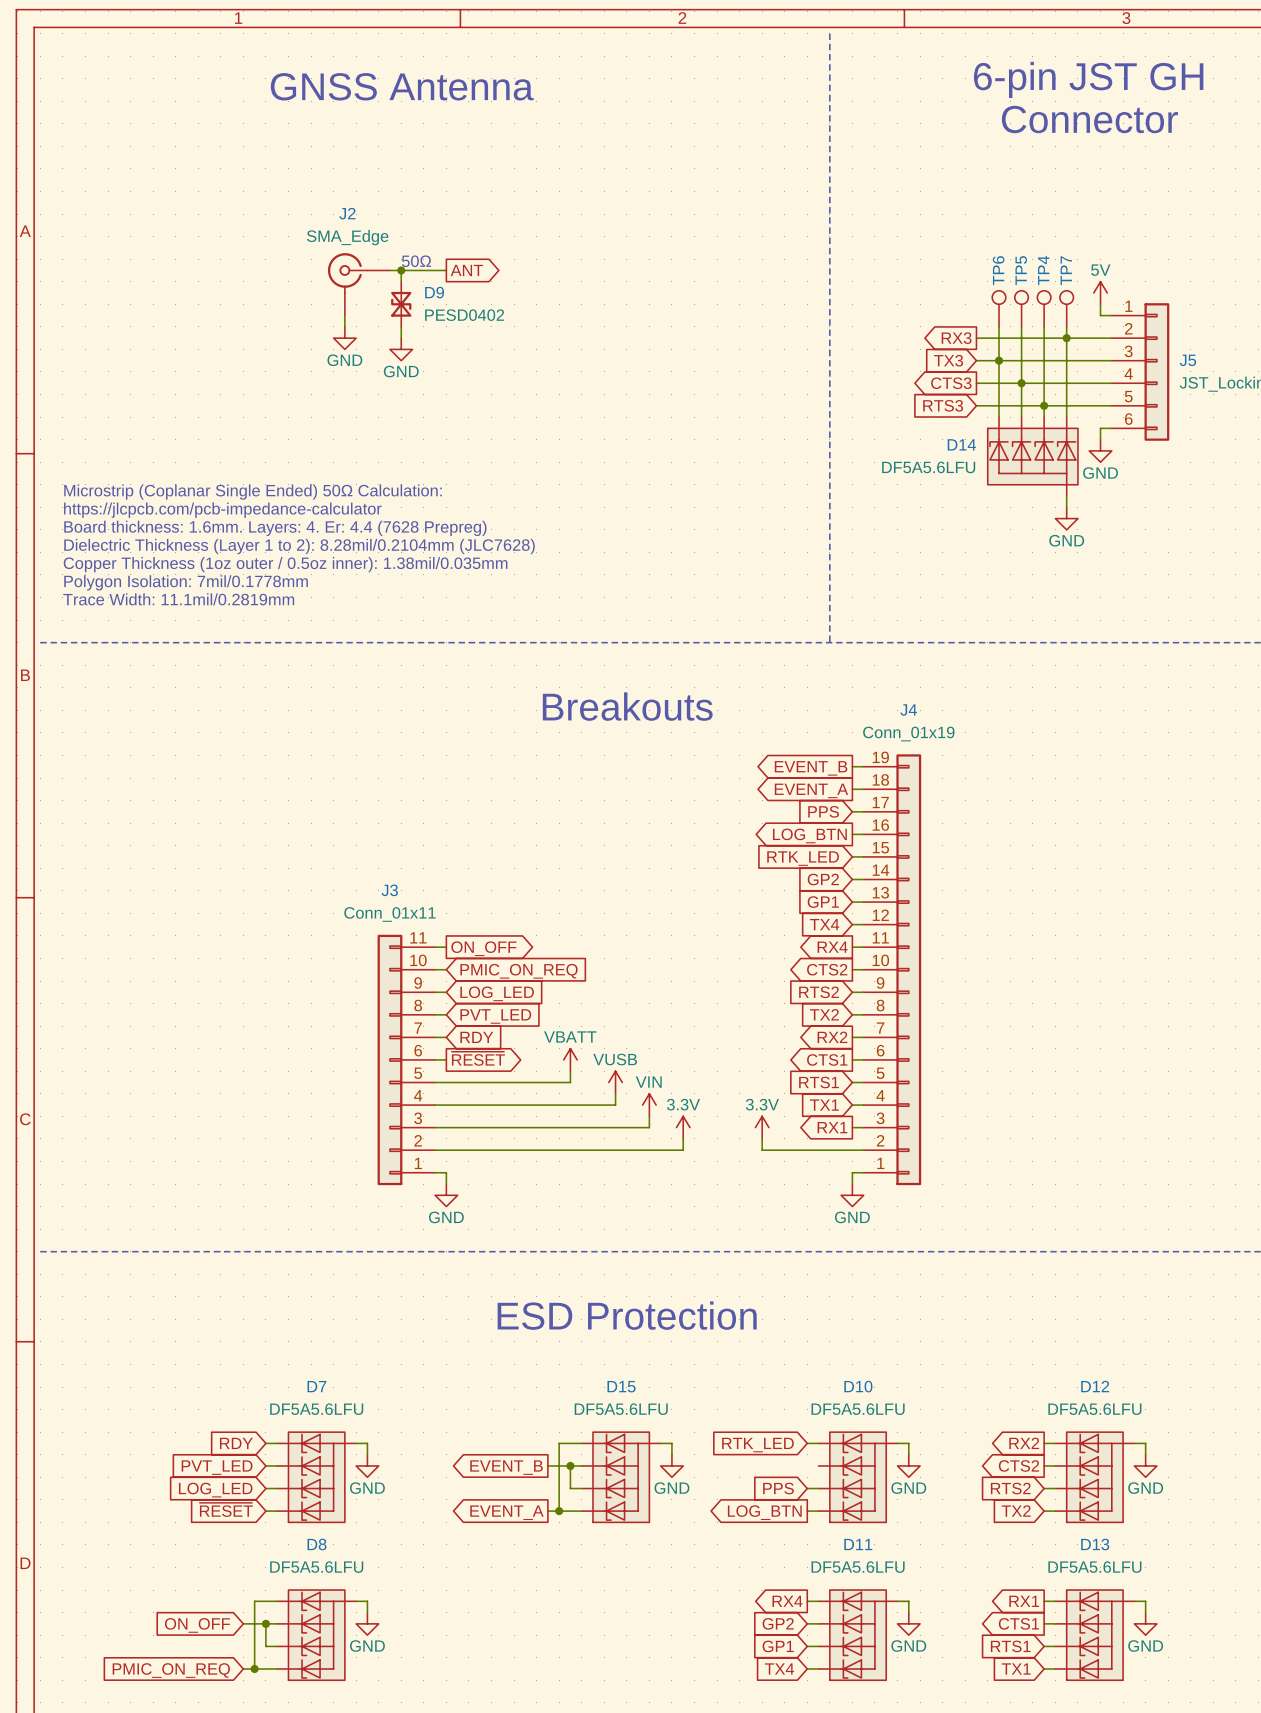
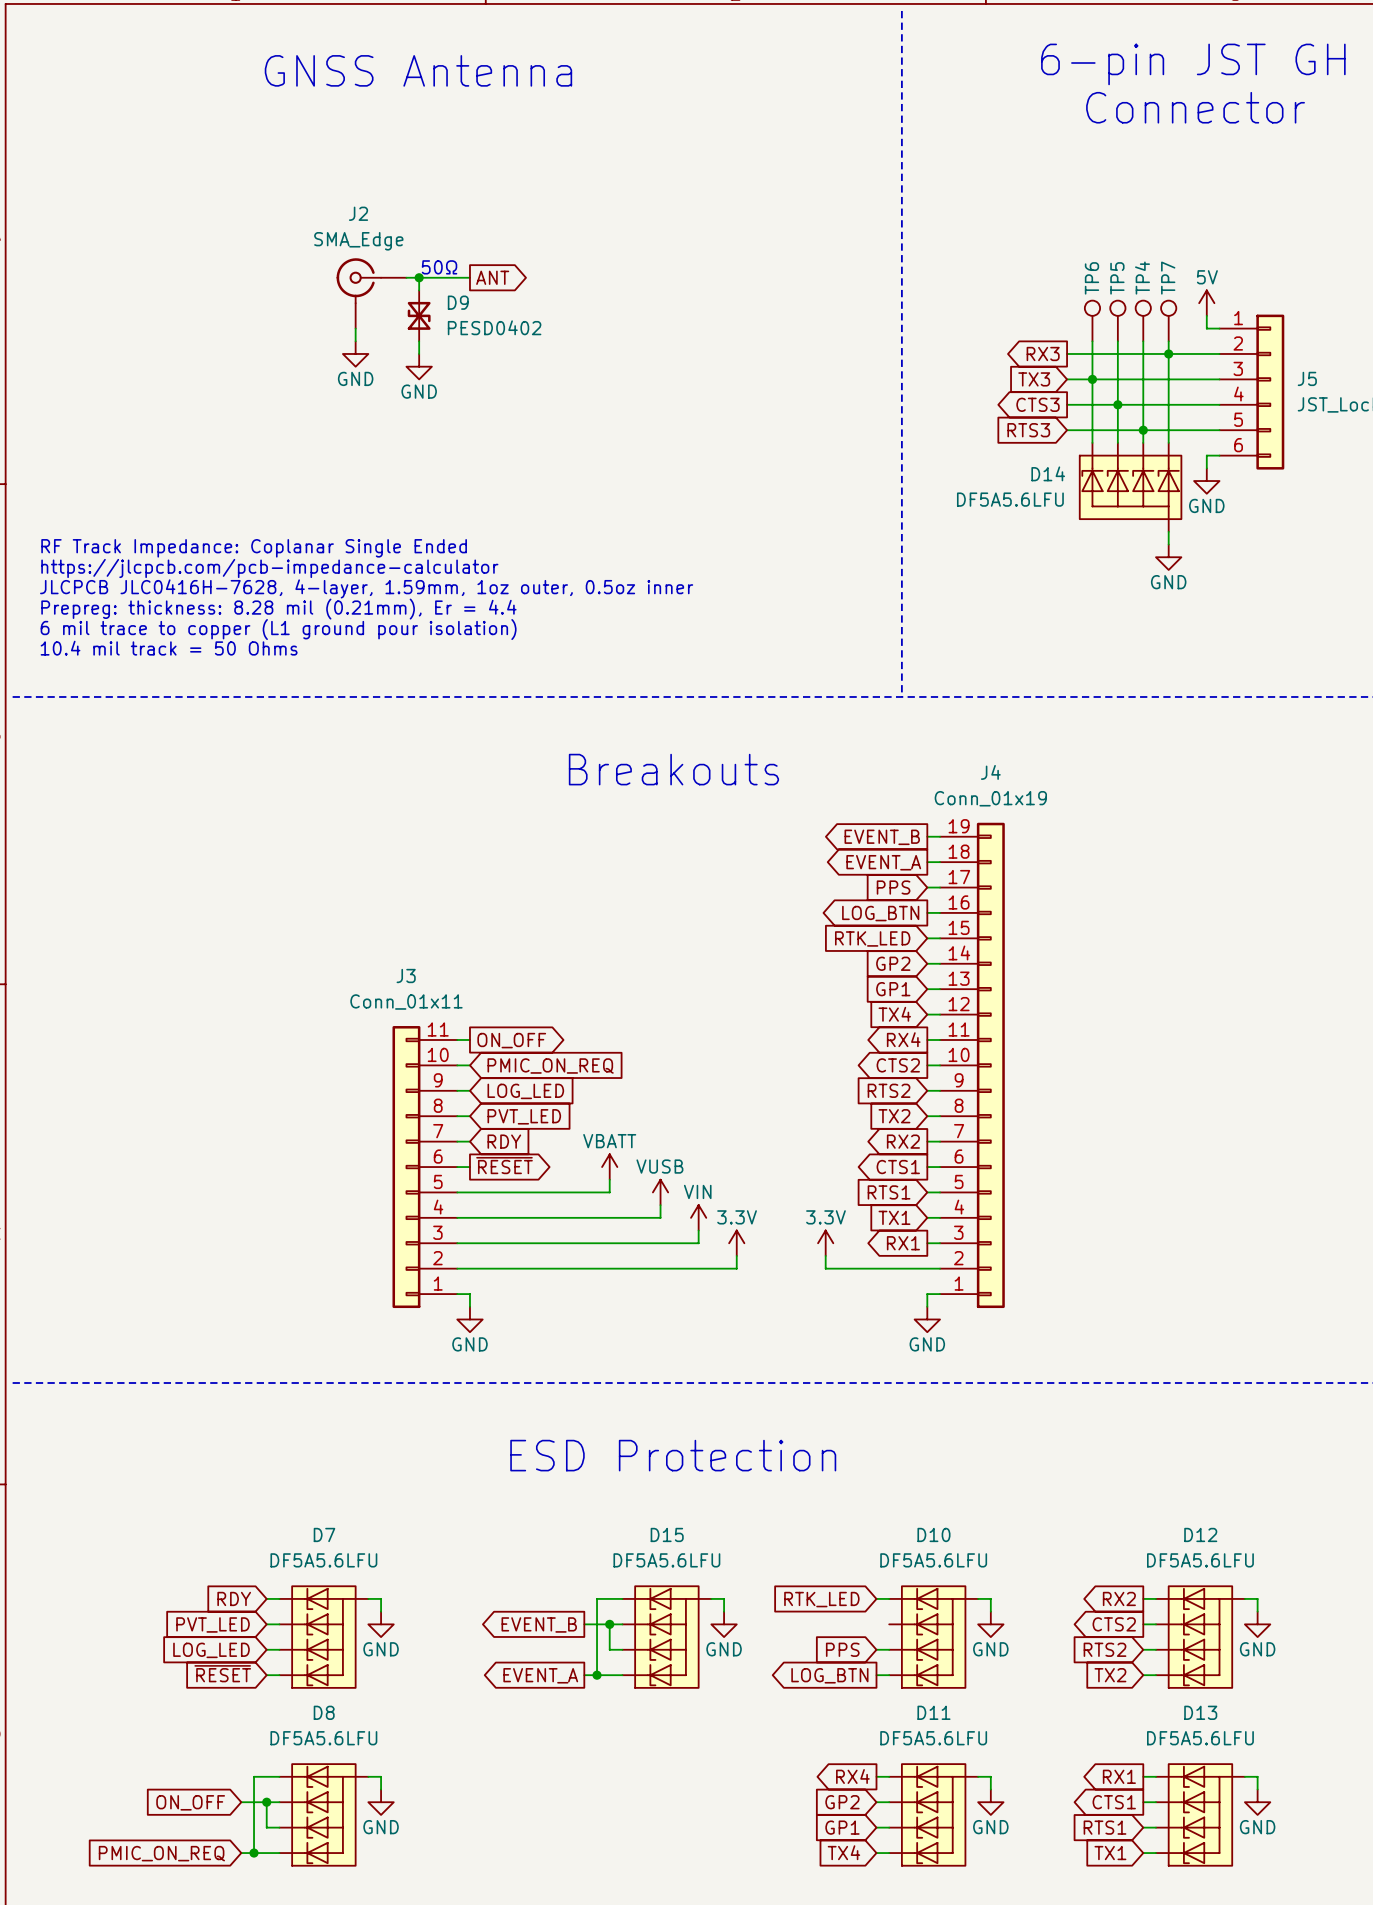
text: Microstrip (Coplanar Single Ended) 50Ω Calculation: (253, 492) -> none
text: https://jlcpcb.com/pcb-impedance-calculator (222, 510) -> RF Track Impedance: Coplanar Single Ended (254, 548)
text: Board thickness: 1.6mm. Layers: 4. Er: 4.4 (7628 Prepreg) (275, 528) -> https://jlcpcb.com/pcb-impedance-calculator (269, 568)
text: Dielectric Thickness (Layer 1 to 2): 8.28mil/0.2104mm (JLC7628) (299, 546) -> JLCPCB JLC0416H-7628, 4-layer, 1.59mm, 1oz outer, 0.5oz inner (366, 588)
text: Copper Thickness (1oz outer / 0.5oz inner): 1.38mil/0.035mm (285, 564) -> Prepreg: thickness: 8.28 mil (0.21mm), Er = 4.4 (278, 609)
text: Polygon Isolation: 7mil/0.1778mm (186, 582) -> 6 mil trace to copper (L1 ground pour isolation) (278, 629)
text: Trace Width: 11.1mil/0.2819mm (178, 599) -> 10.4 mil track = 50 Ohms (169, 648)

